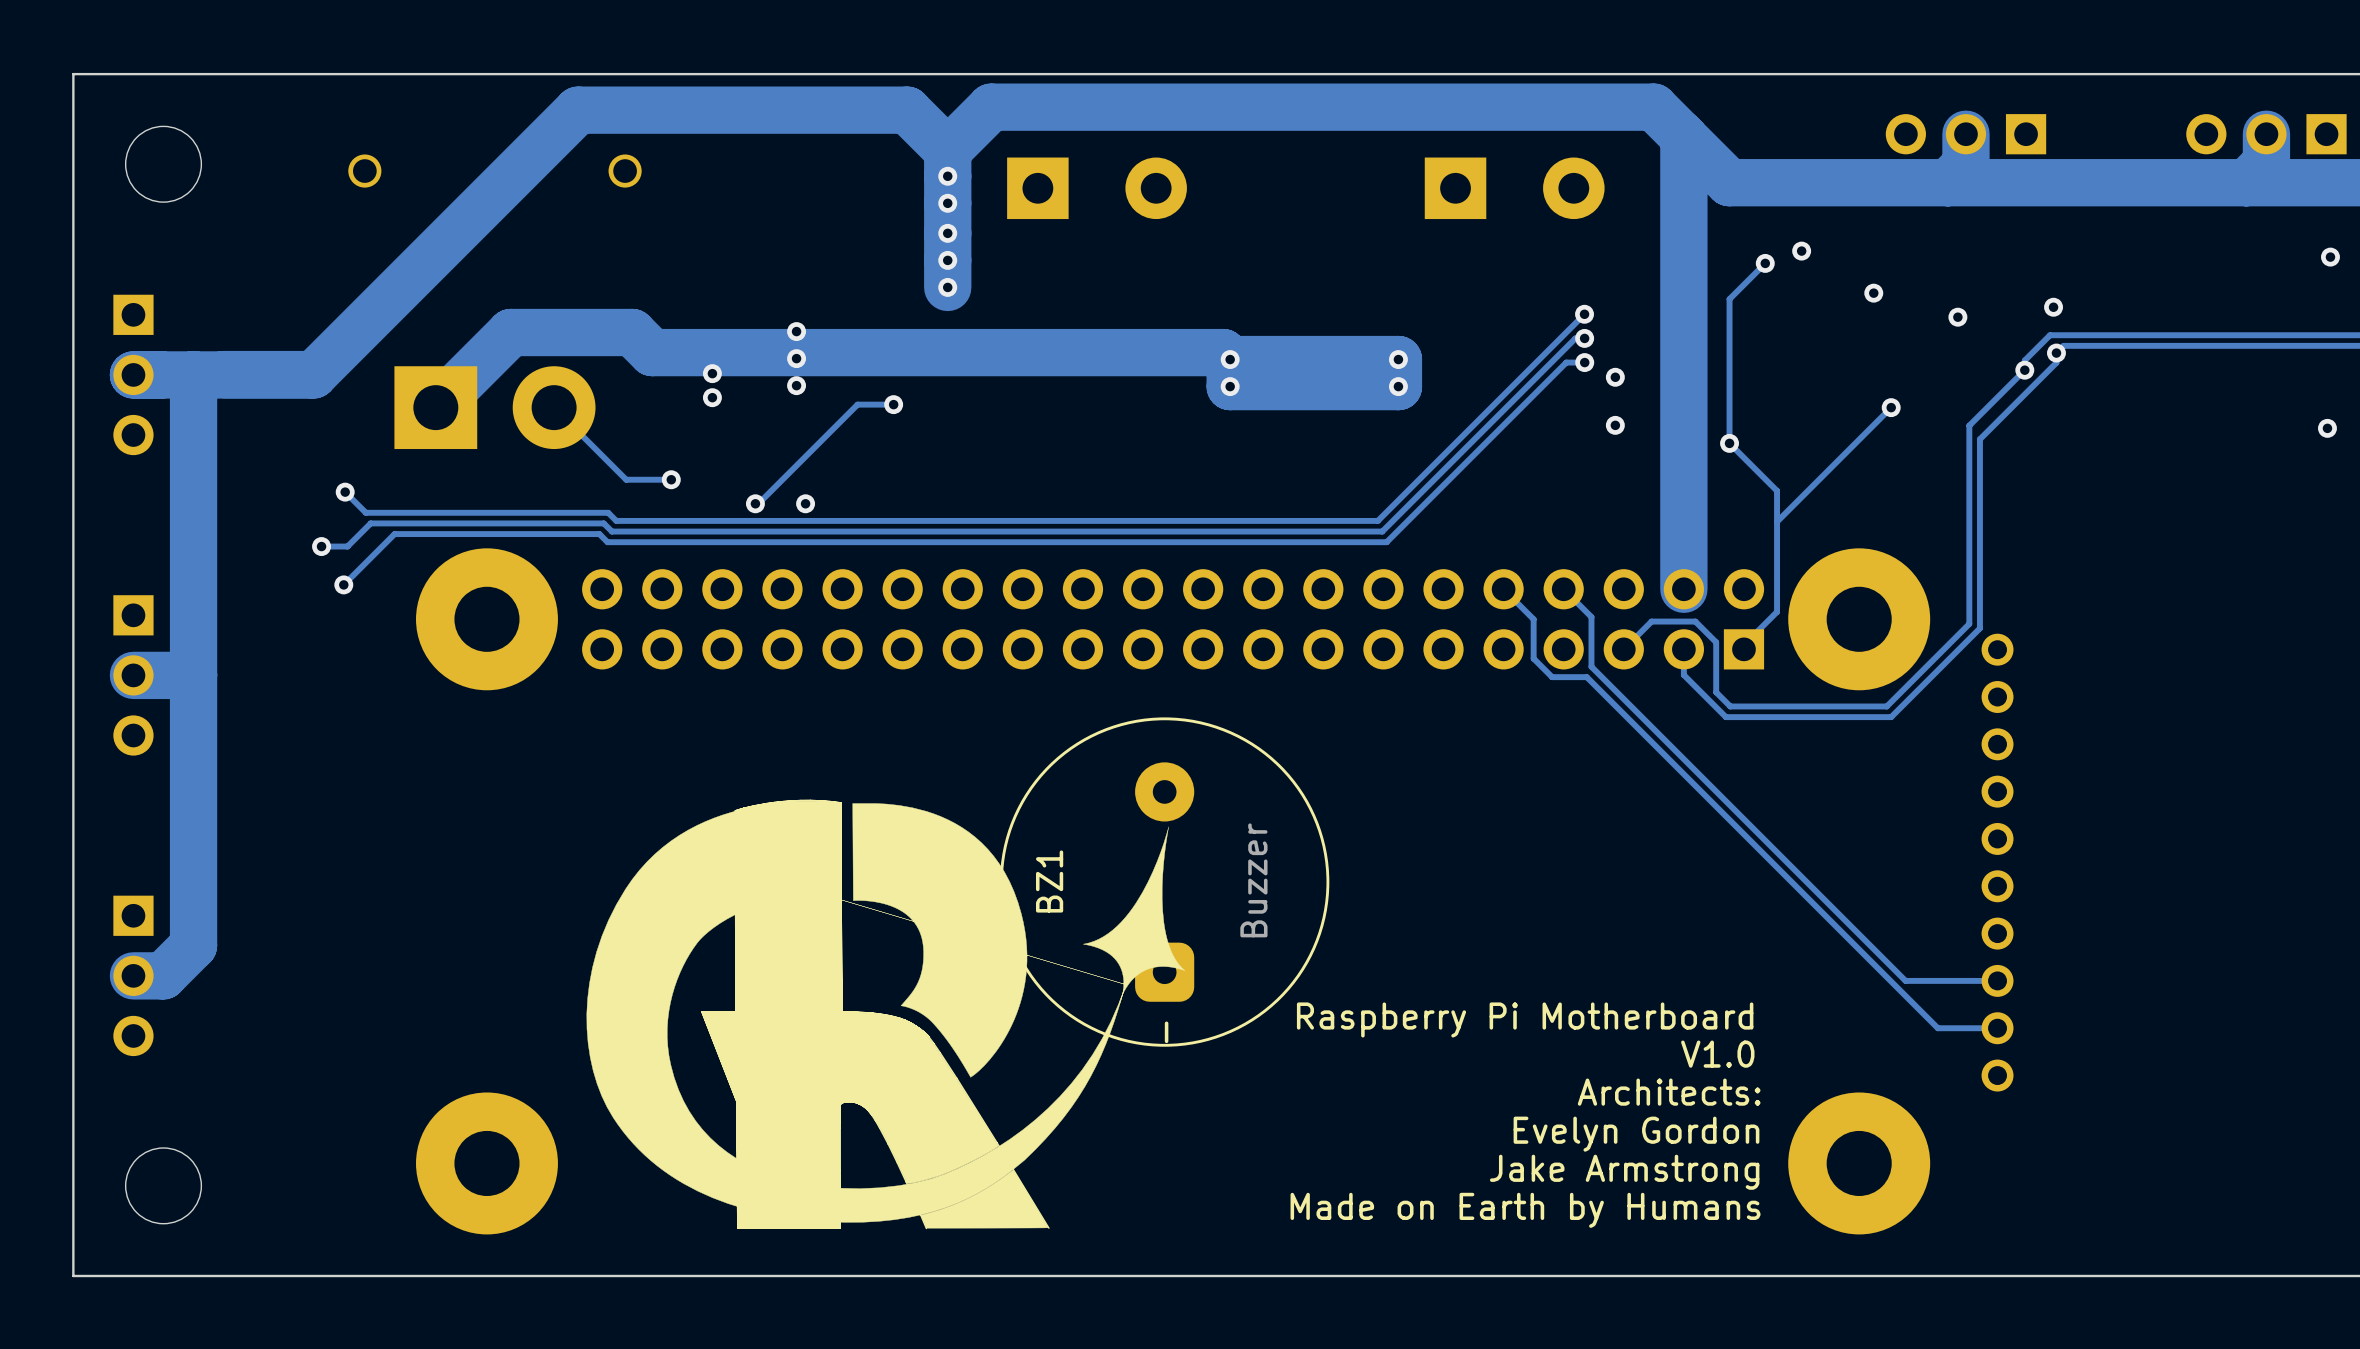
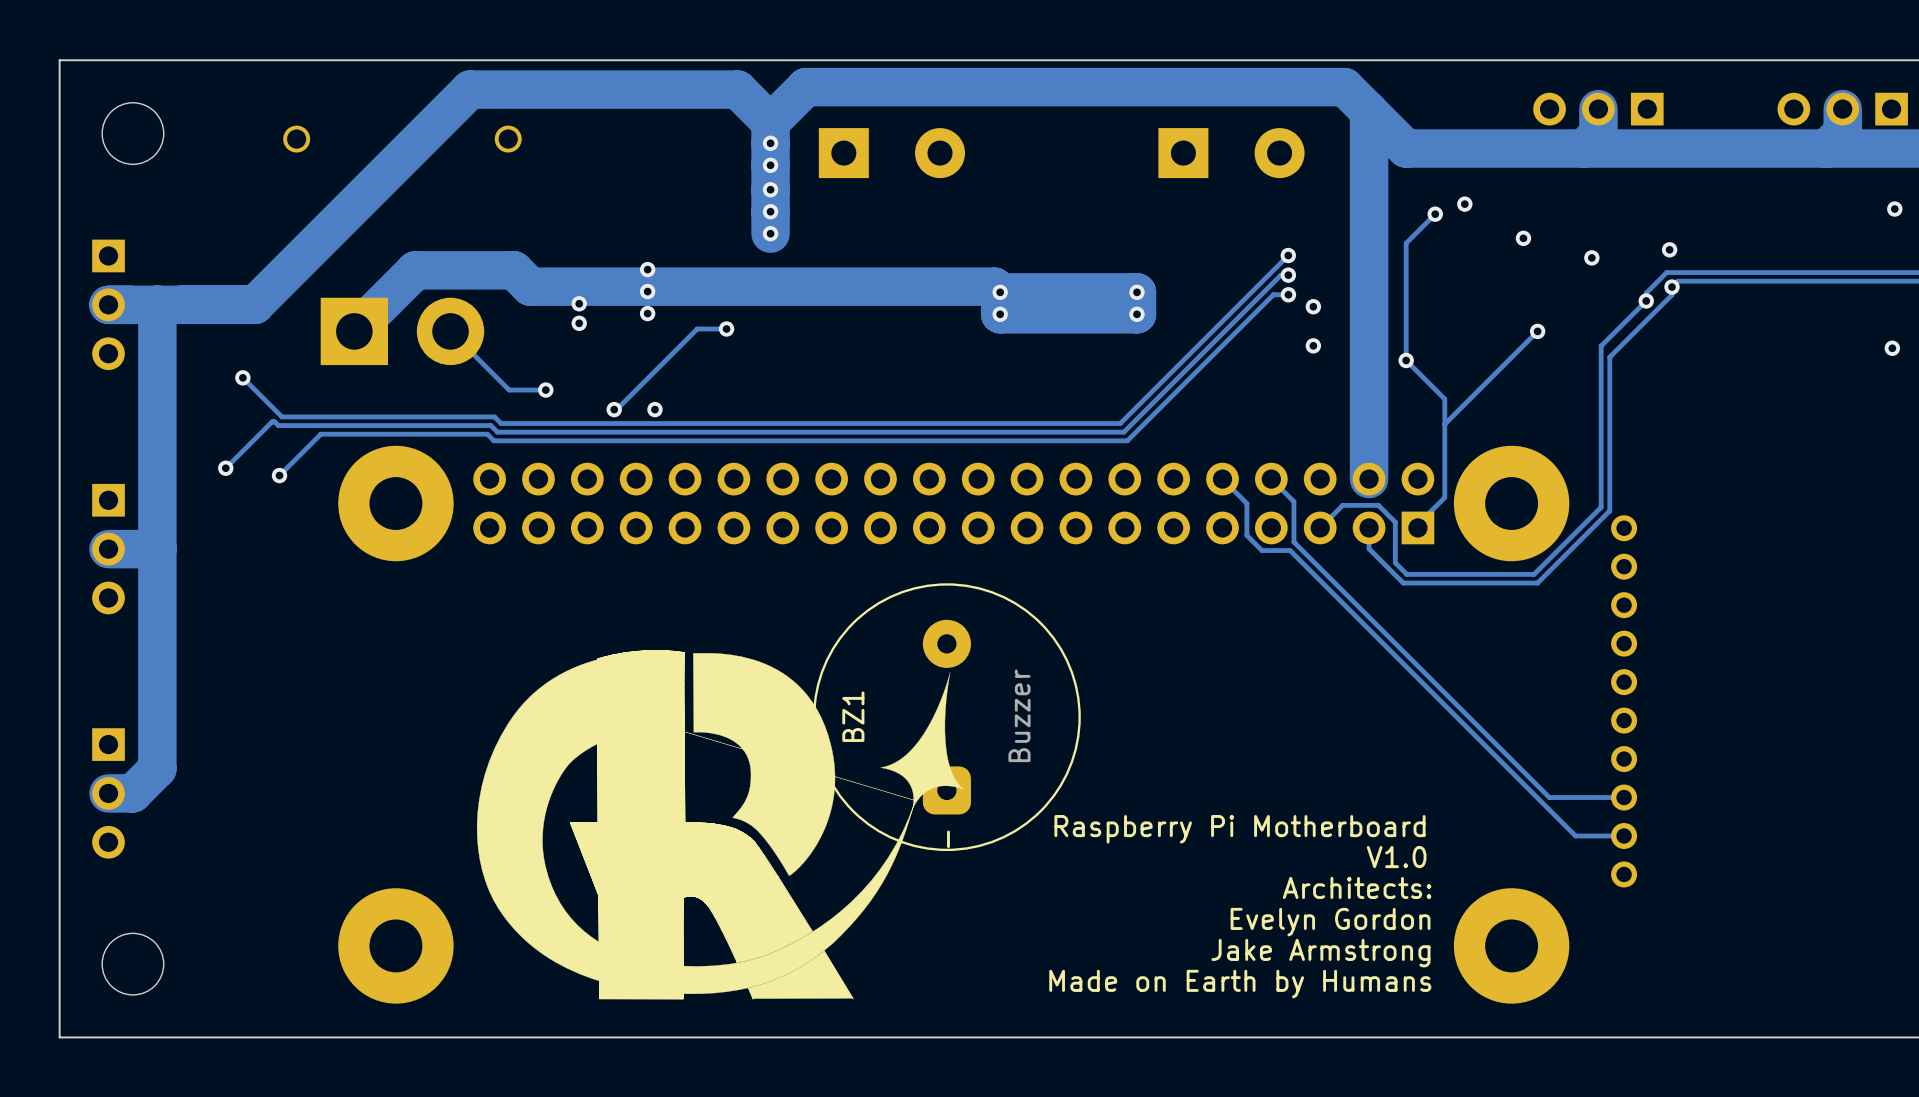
via: none -> (242, 377)
track: (345, 492) (365, 512) -> (242, 377) (281, 416) (297, 416)
via: (345, 492) -> none
track: (370, 523) (347, 546) (321, 546) -> (301, 425) (278, 425) (272, 421) (225, 468)
via: (321, 546) -> none
via: none -> (225, 468)

